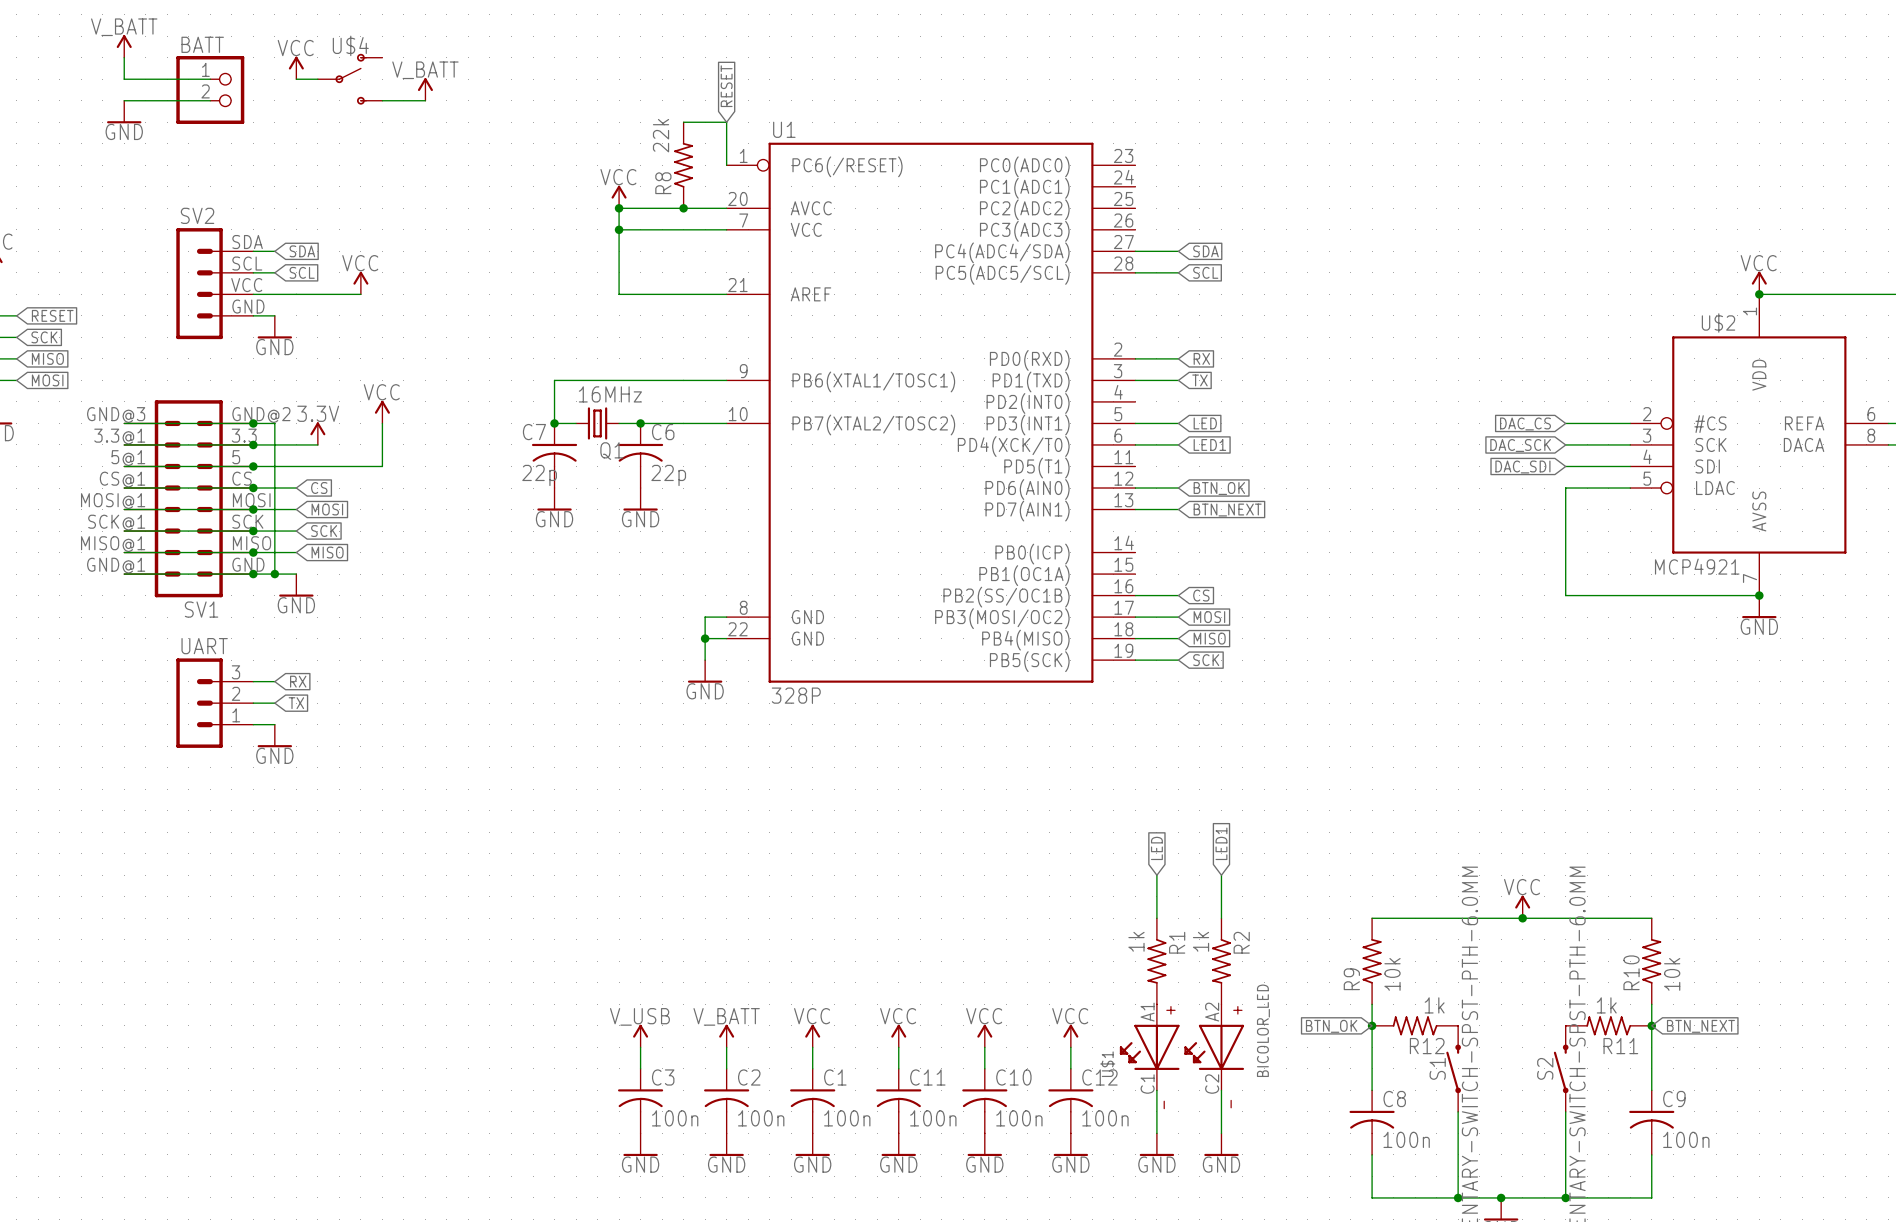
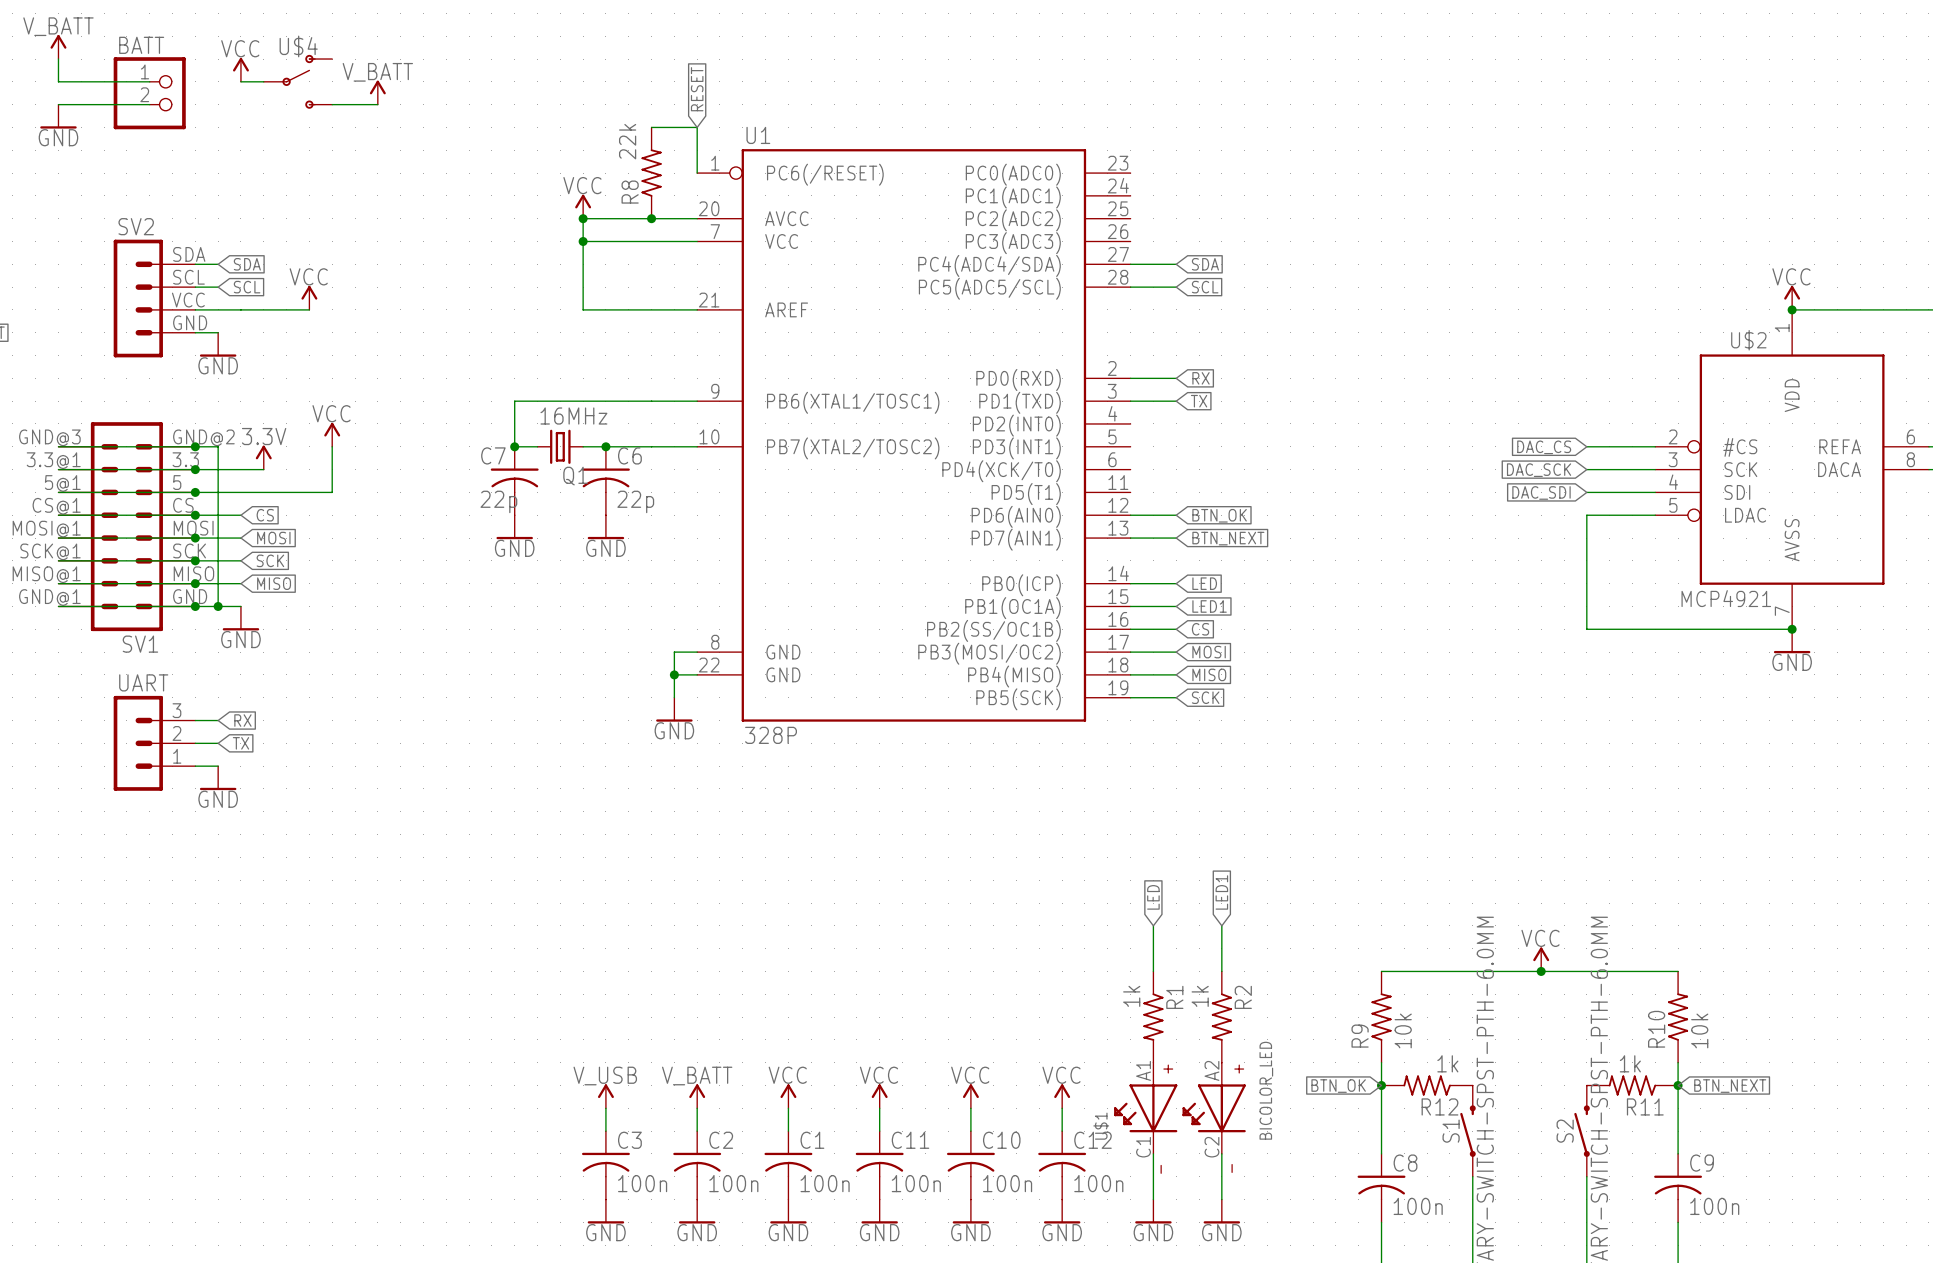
wire: (1135, 423) (1178, 423) -> (1130, 583) (1176, 583)
global label position: LED (1205, 423) -> LED (1204, 583)
wire: (1135, 444) (1178, 444) -> (1130, 606) (1176, 606)
global label position: LED1 (1209, 444) -> LED1 (1209, 606)

